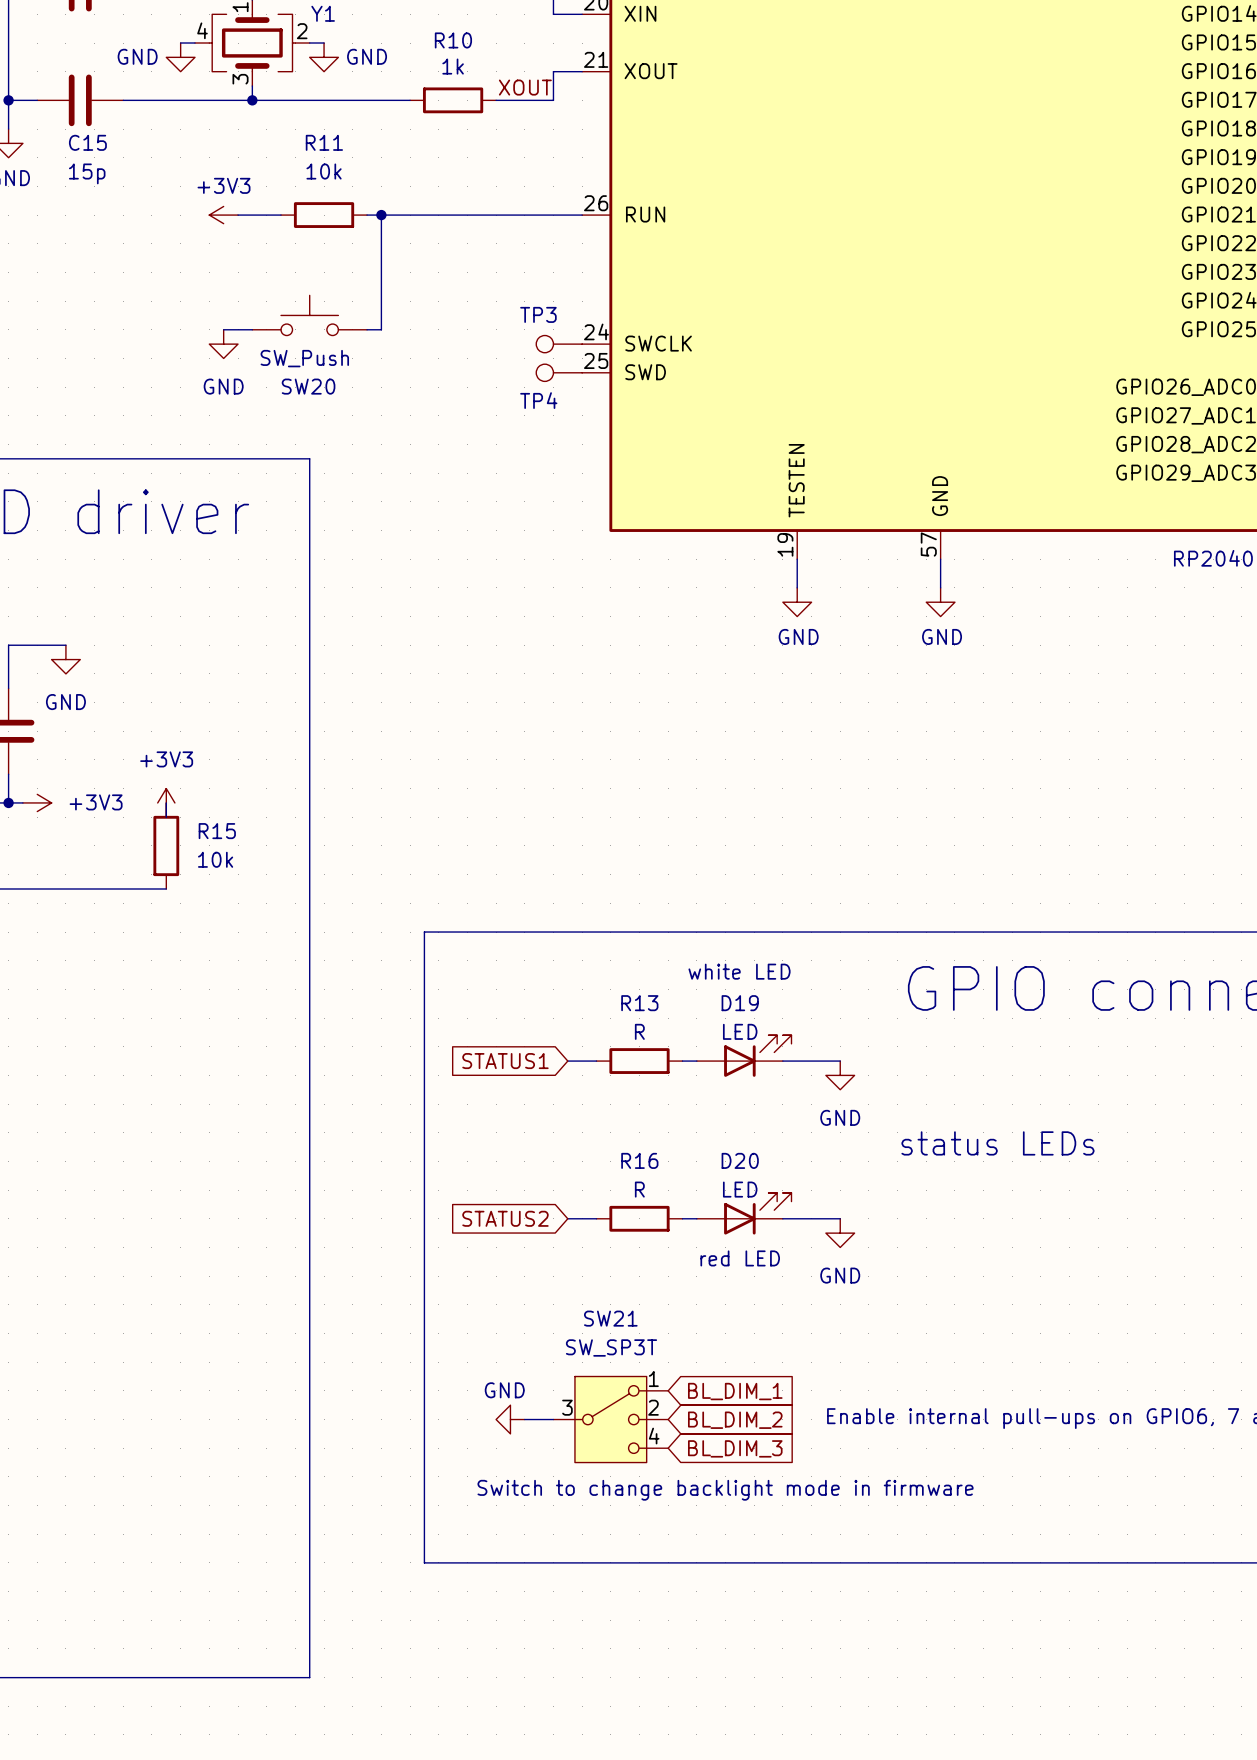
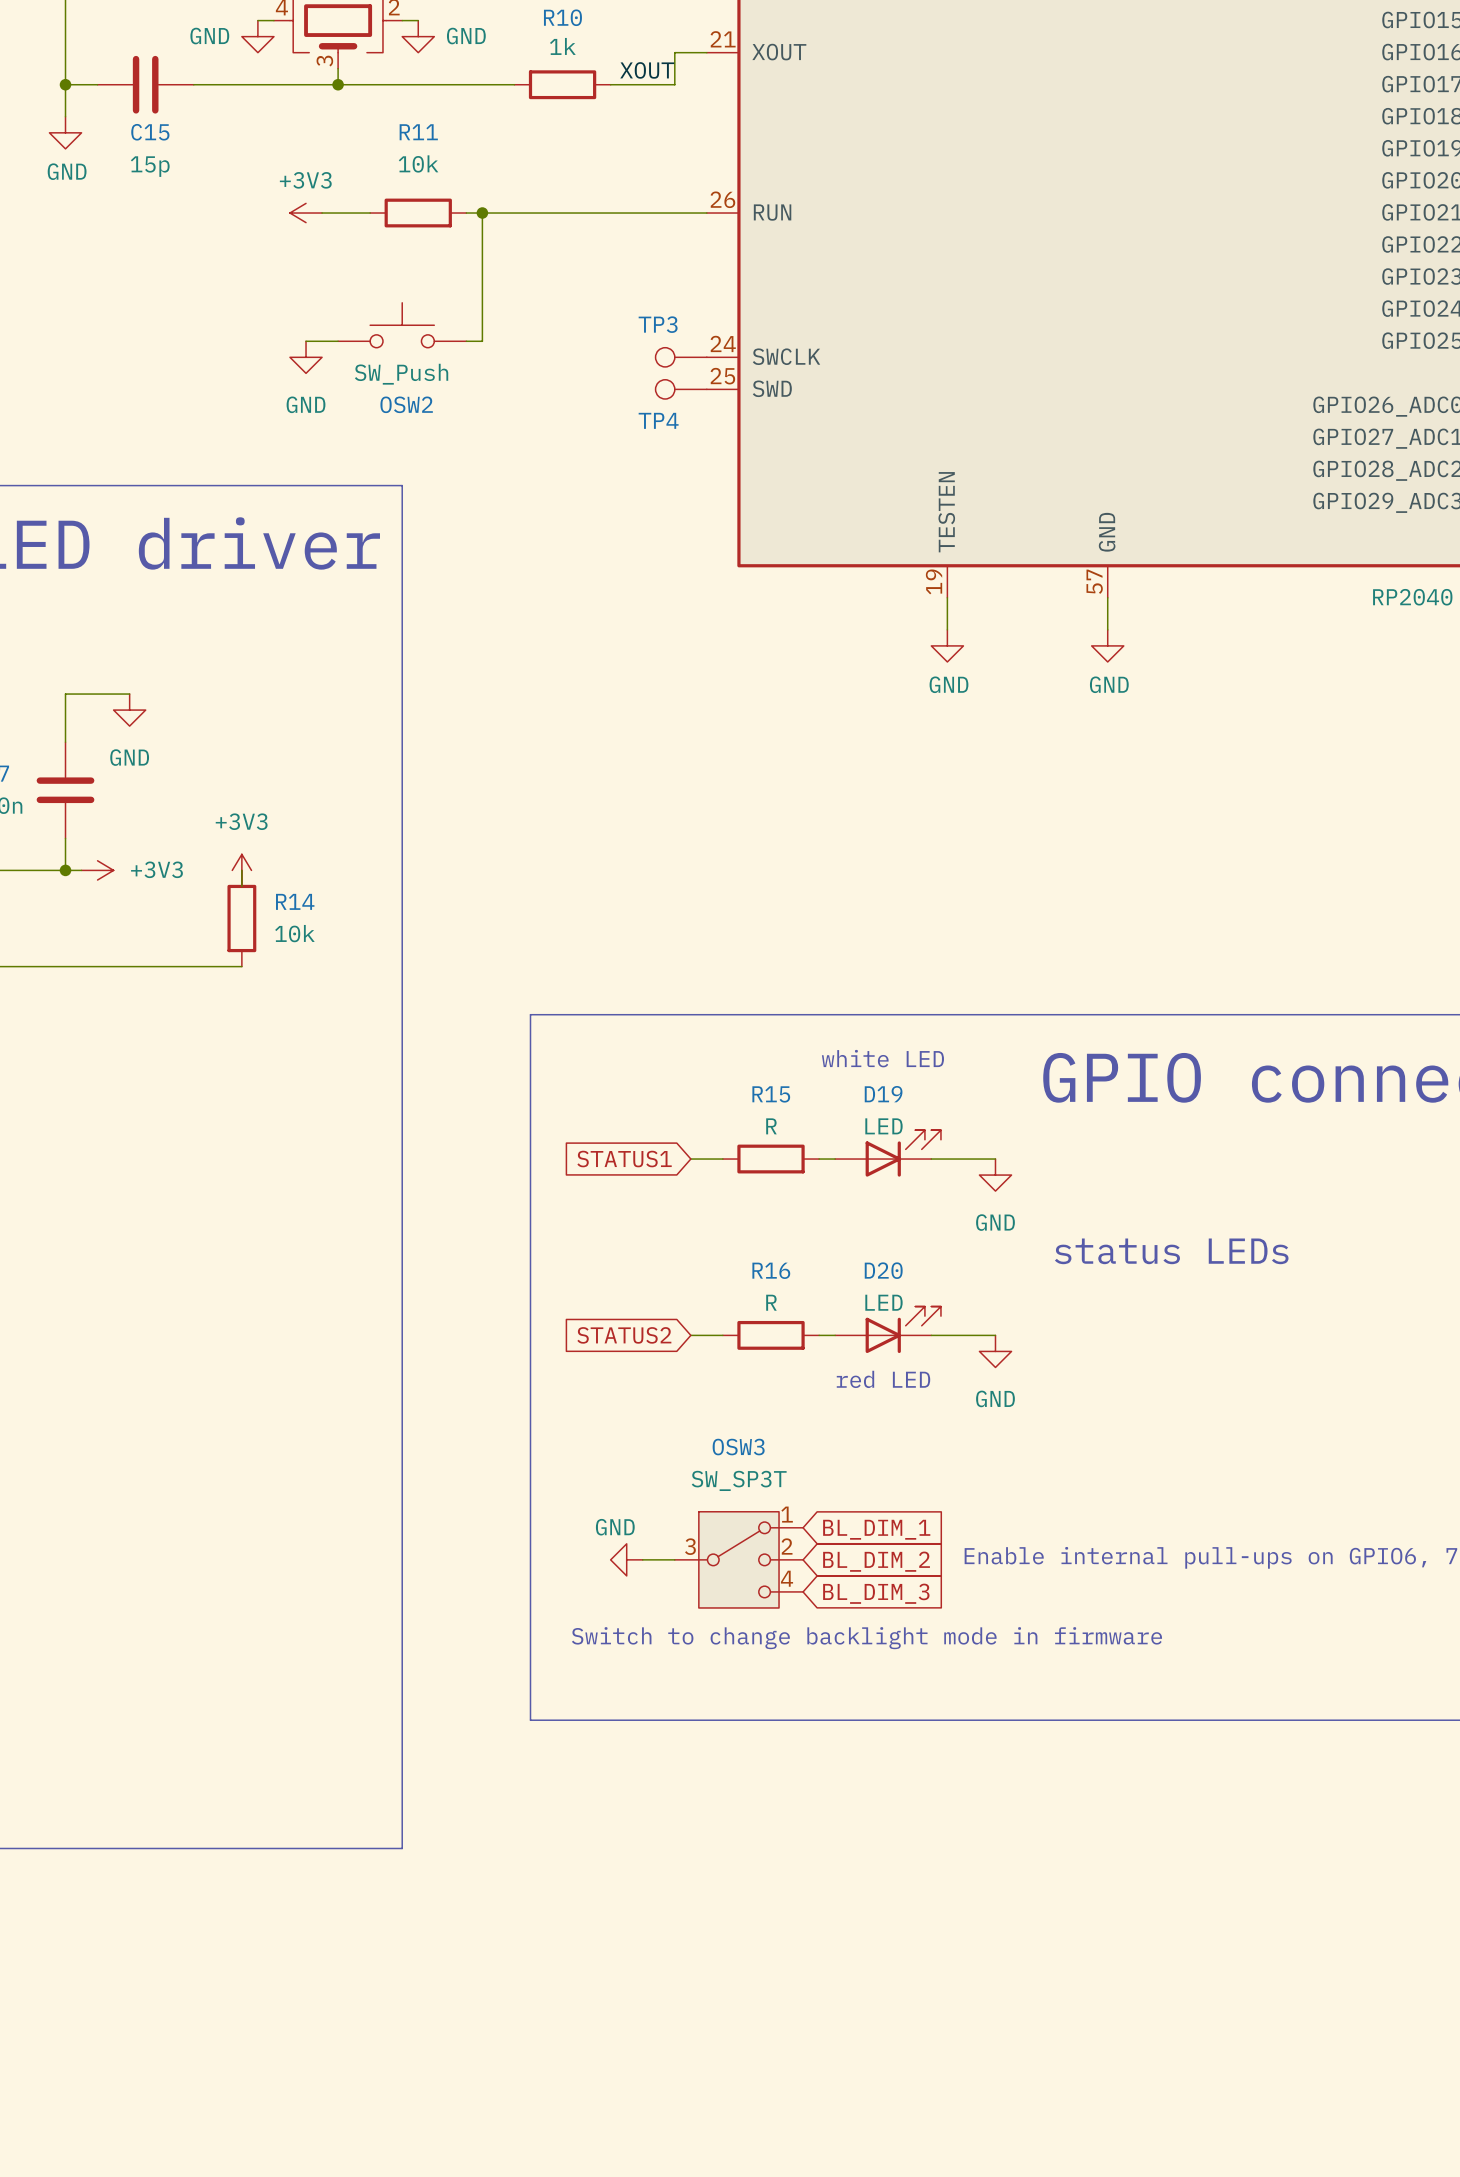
SW20 name: SW20 (308, 386) -> OSW2 (406, 404)
R15 name: R15 (217, 831) -> R14 (295, 901)
R13 name: R13 (639, 1003) -> R15 (771, 1094)
SW21 name: SW21 (610, 1318) -> OSW3 (738, 1447)

